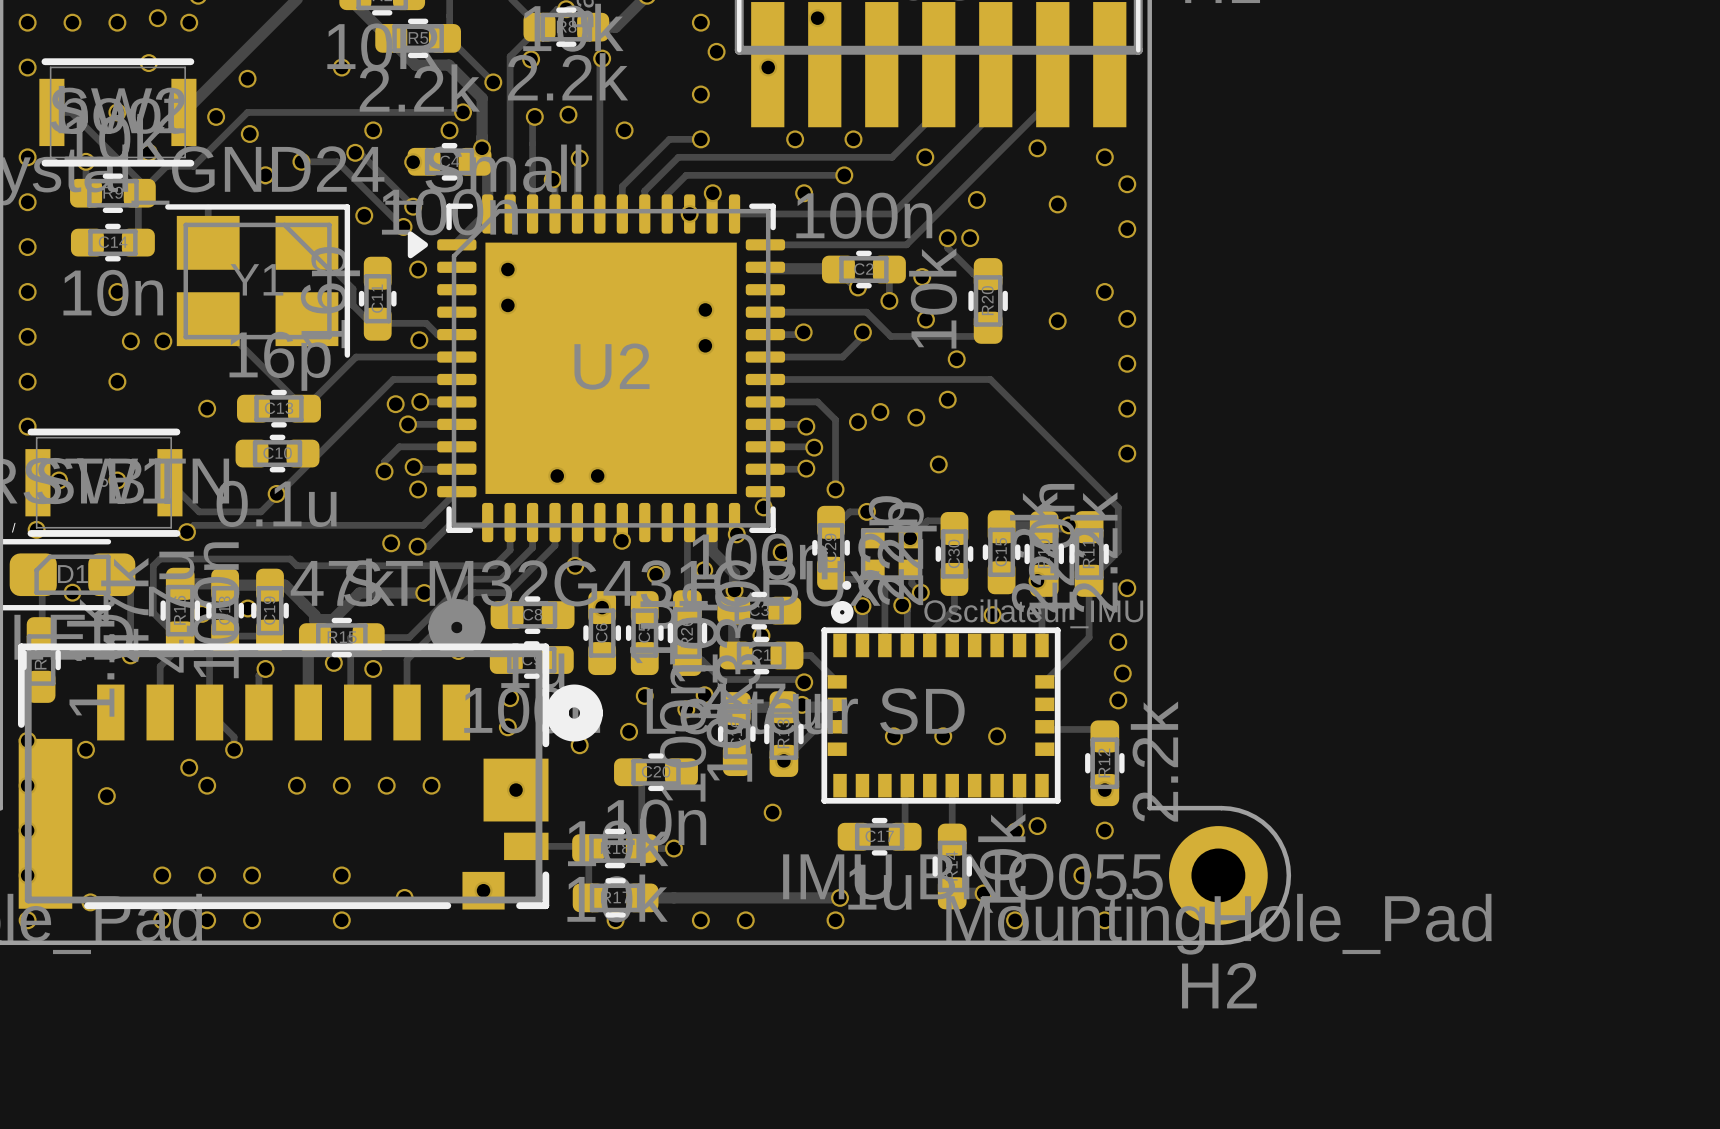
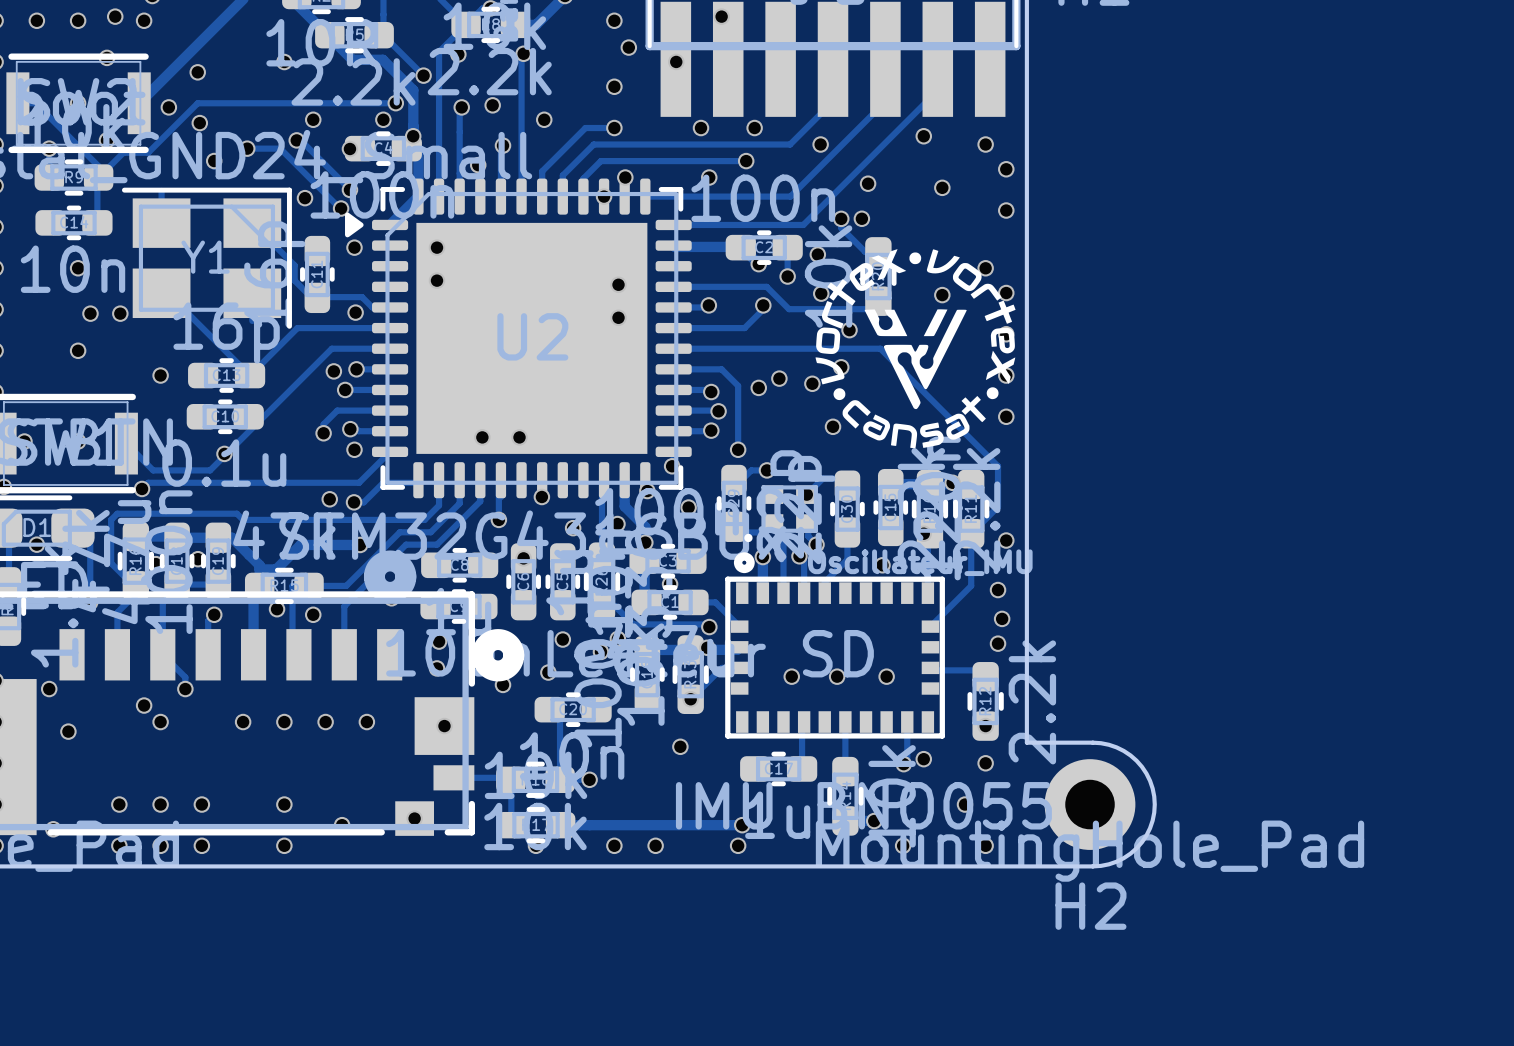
drawing: none -> [815, 249, 1016, 449]

